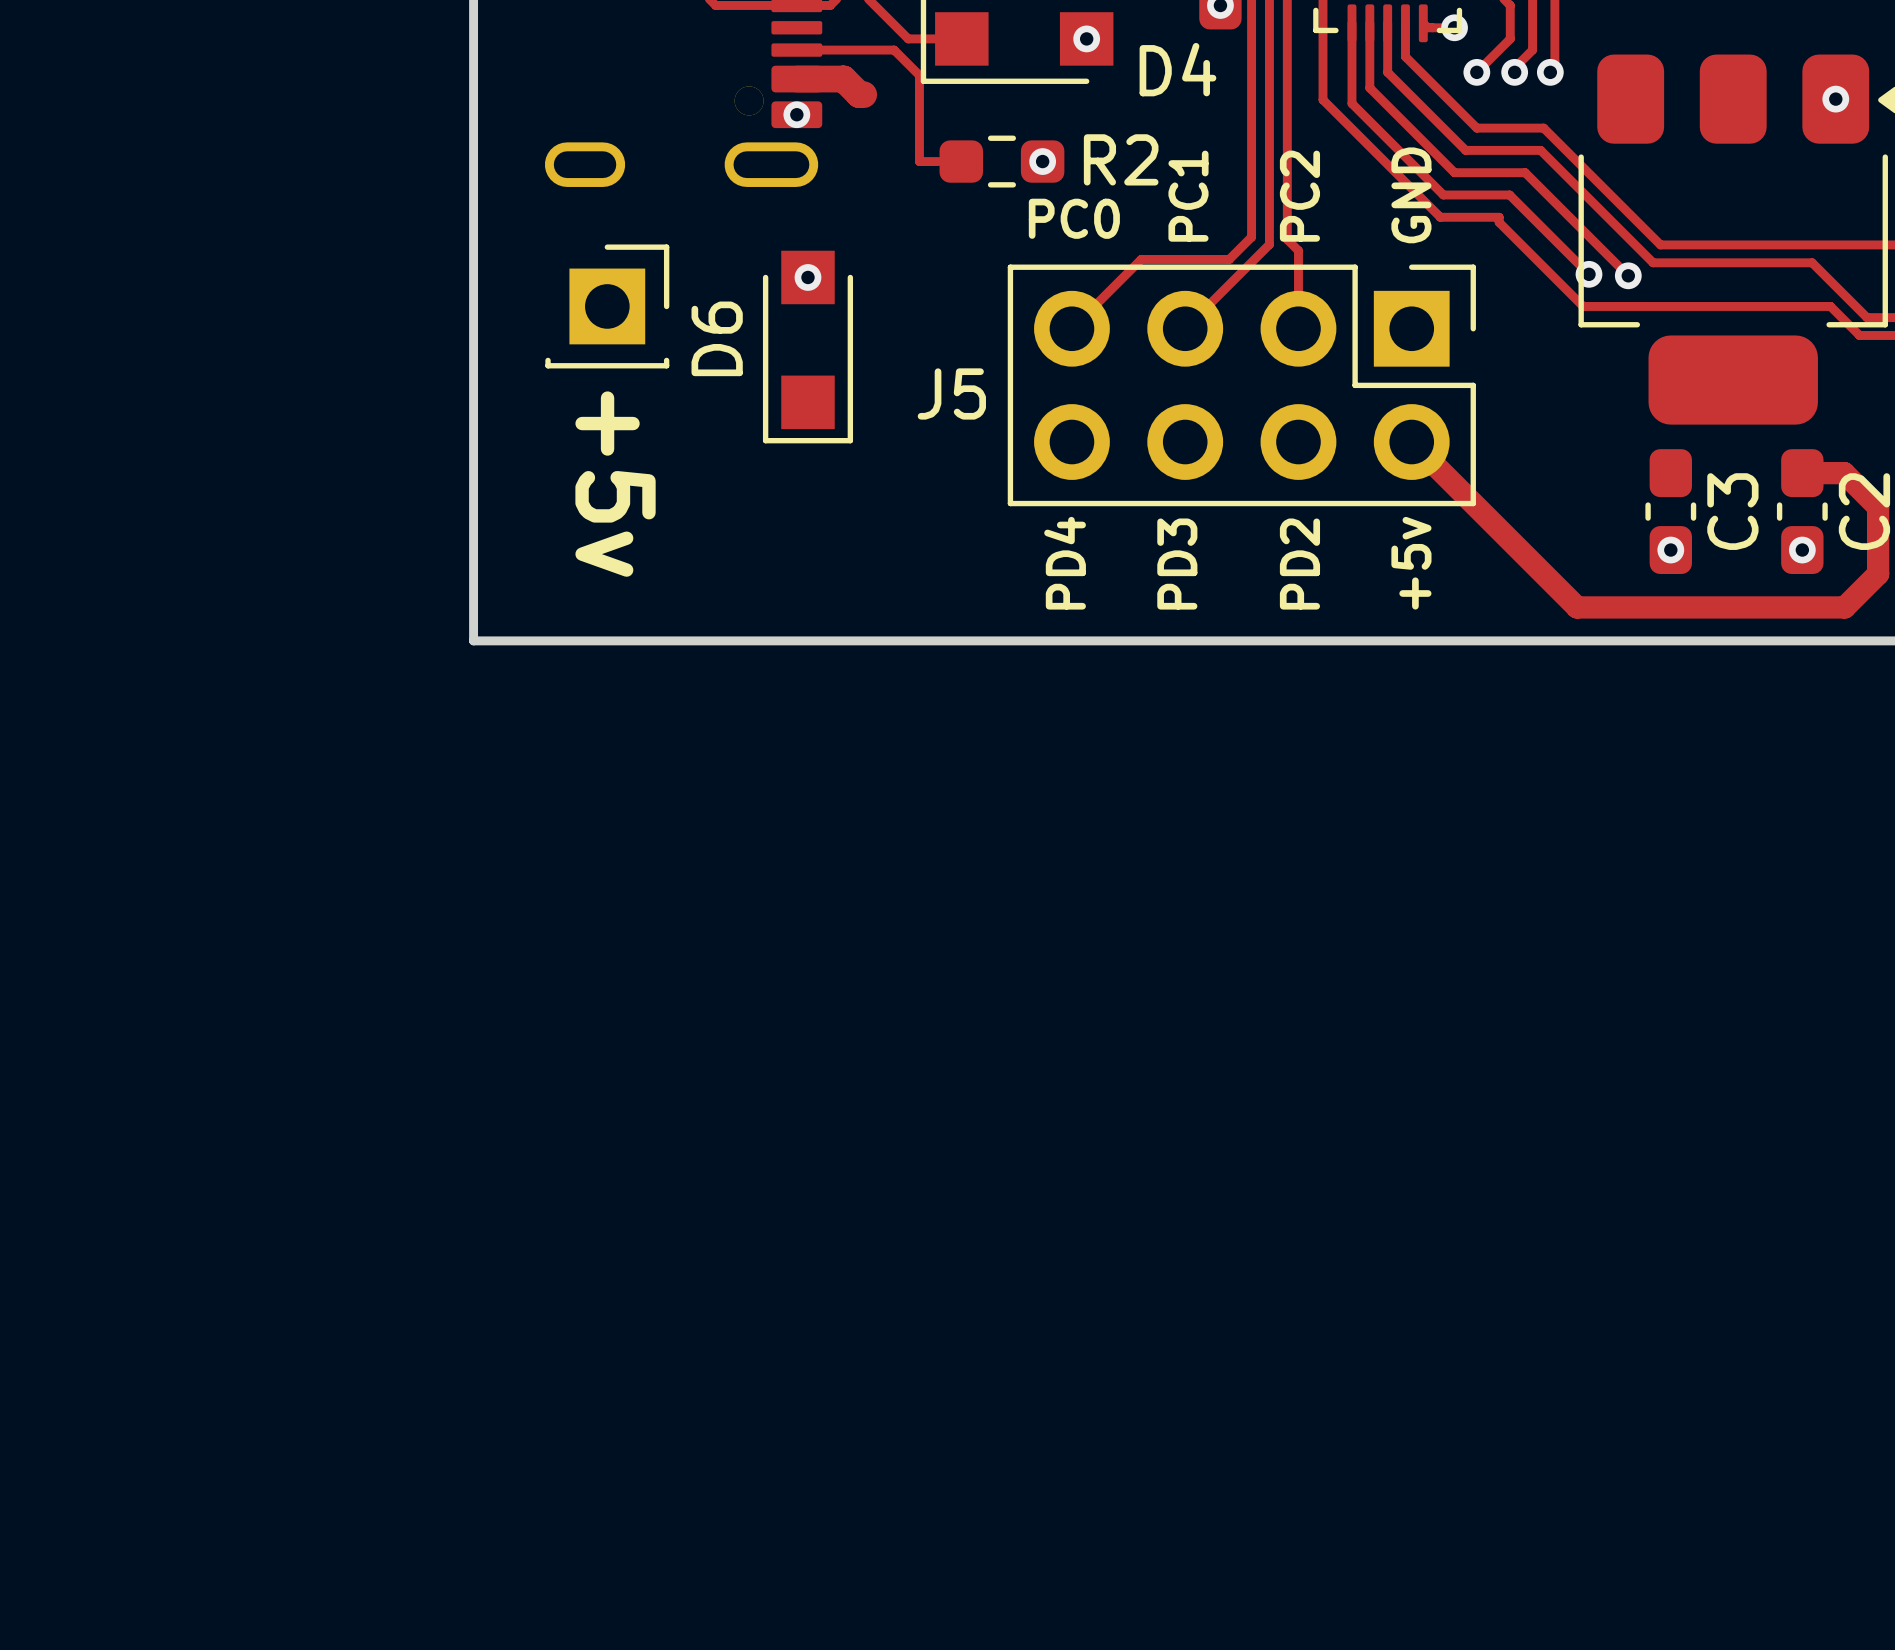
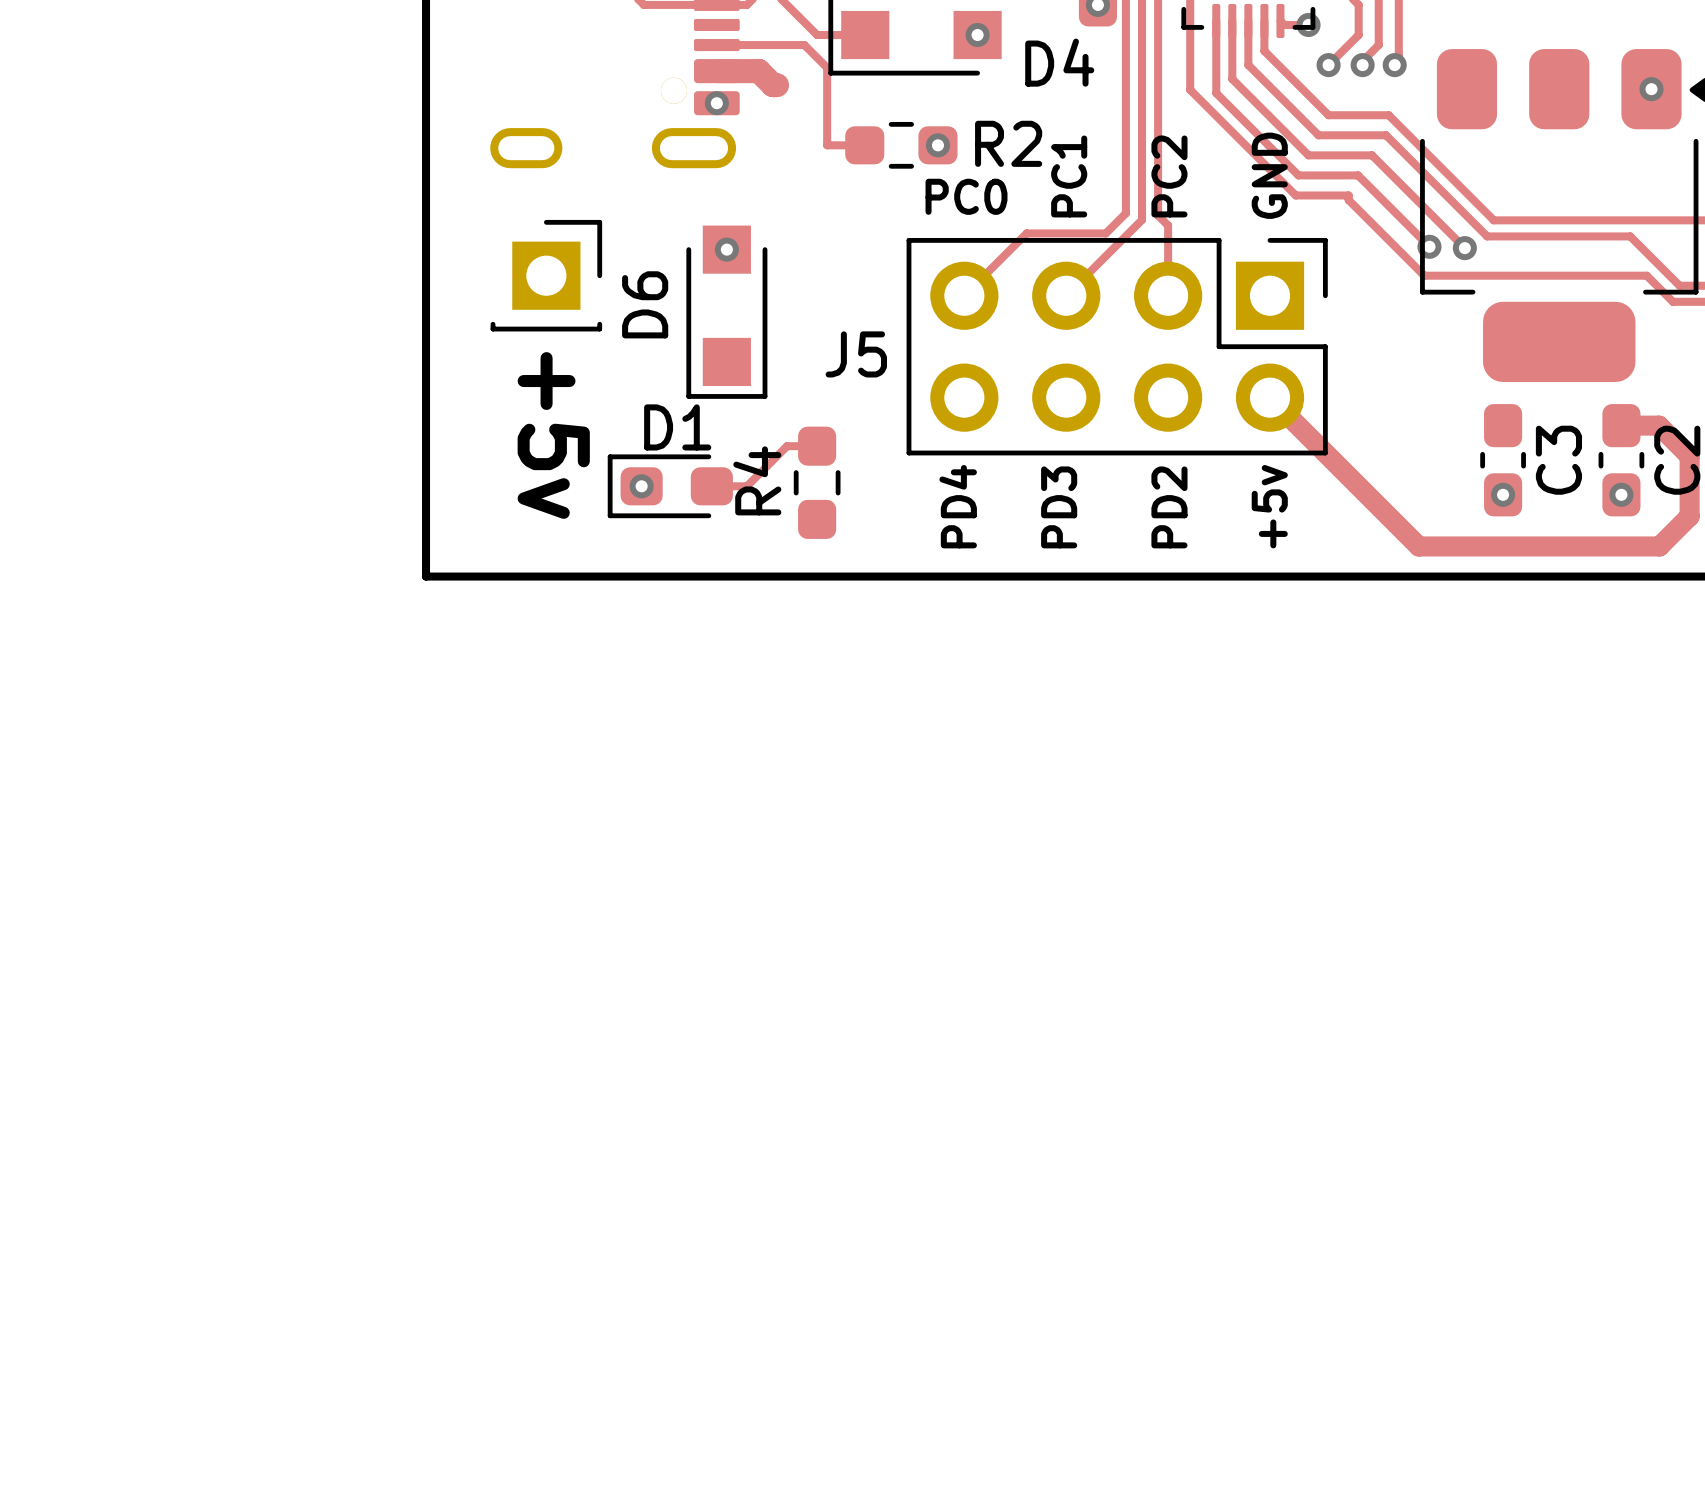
track: none -> (817, 446) (787, 446) (746, 486) (711, 486)
R4: none -> (817, 482)
via: none -> (641, 486)
D1: none -> (670, 486)

